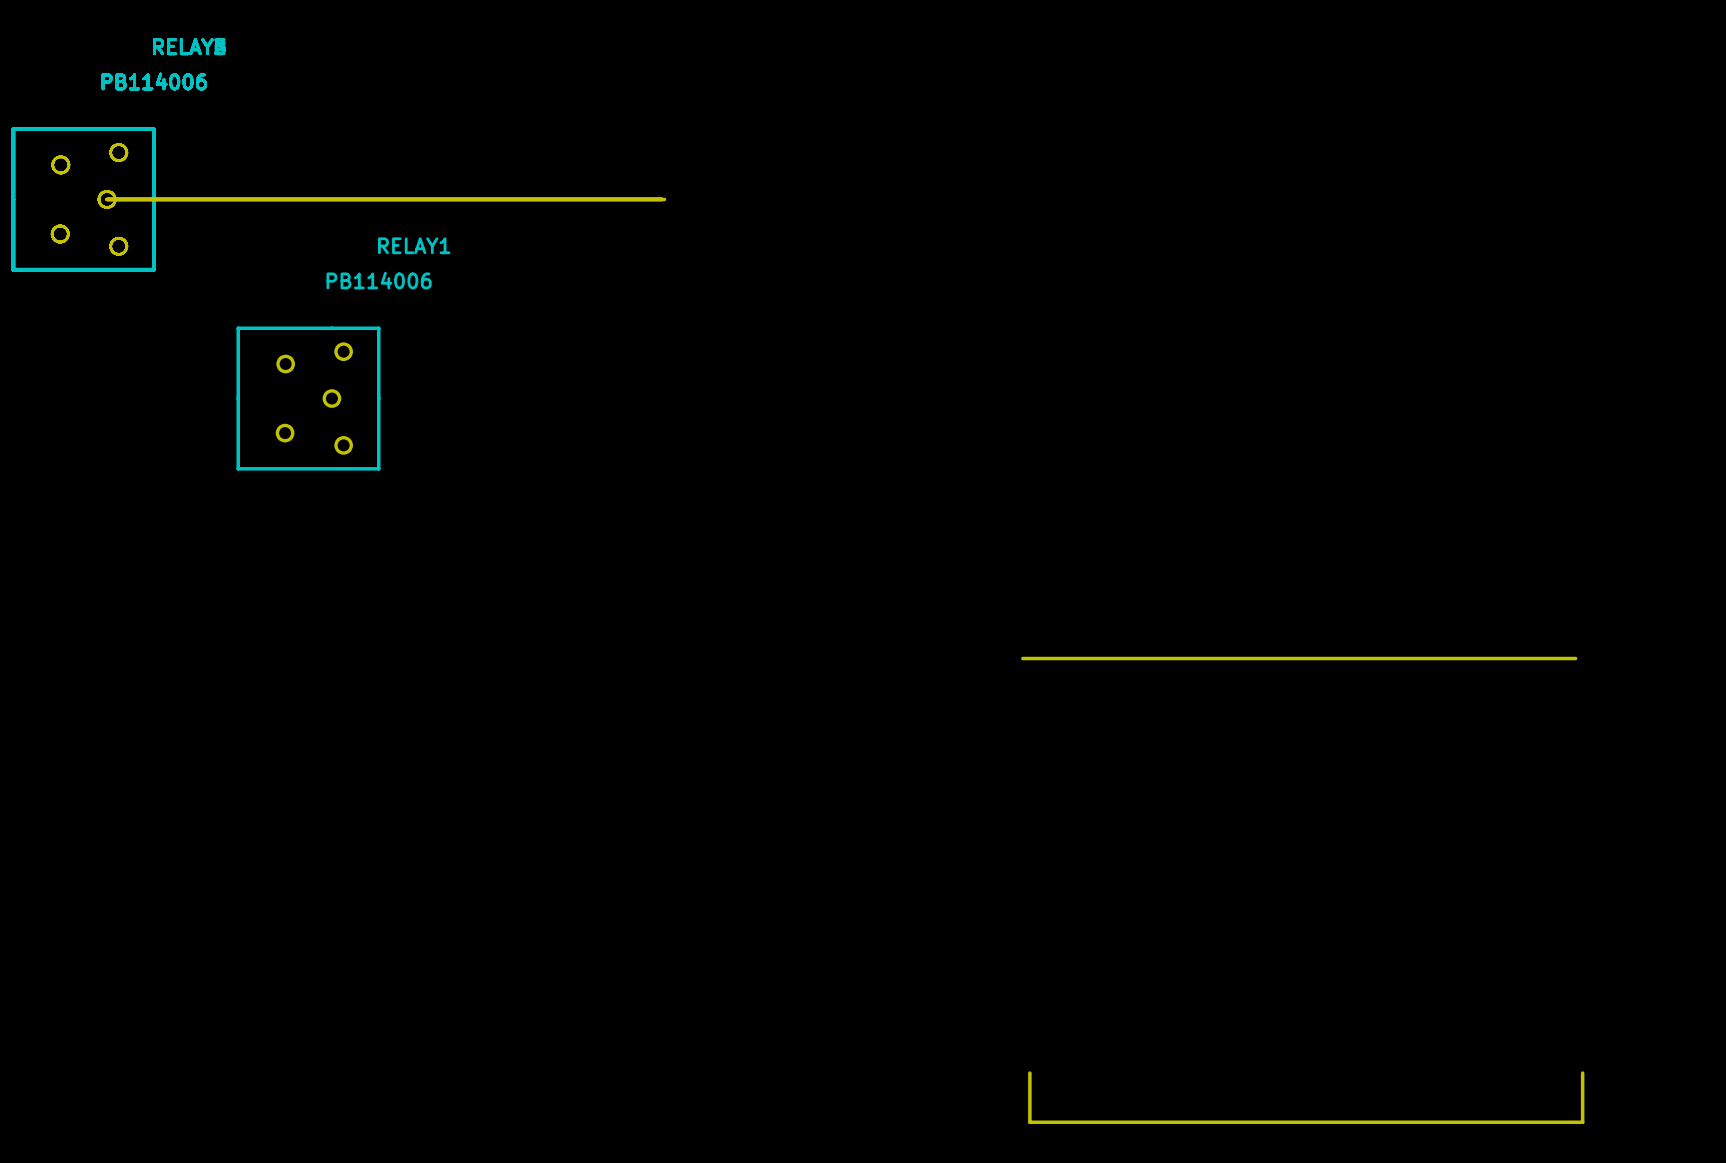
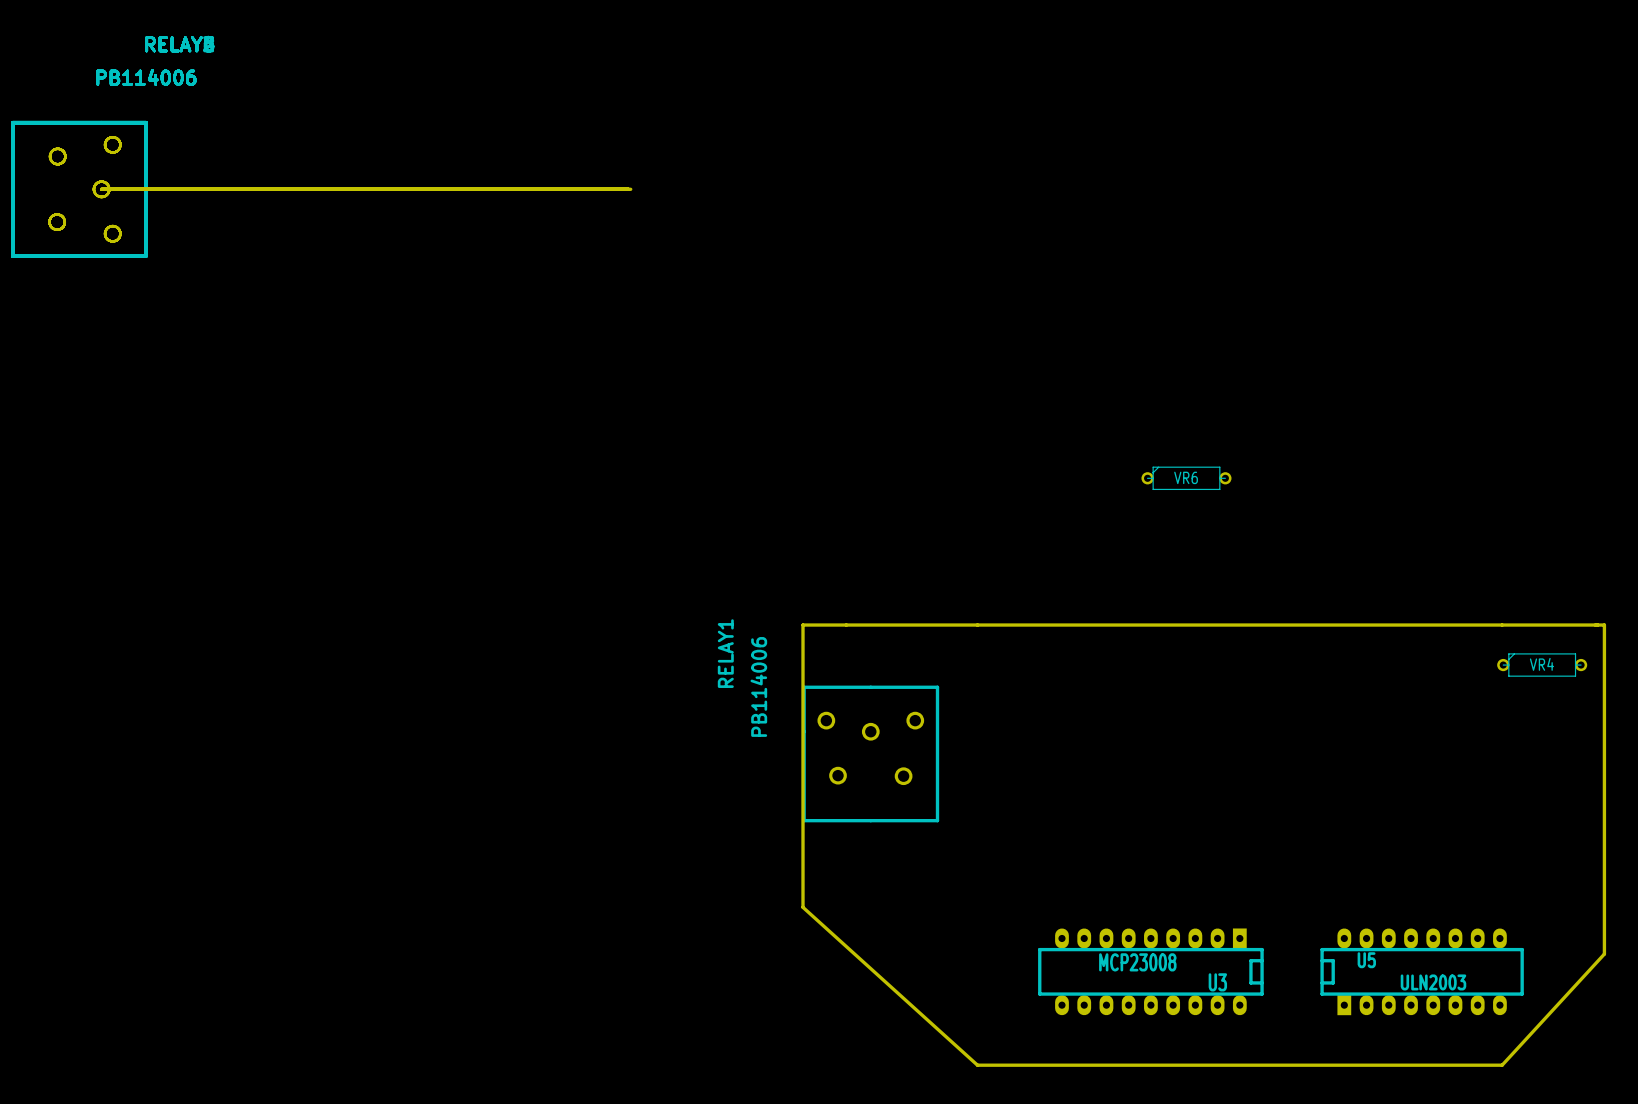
RELAY1 rotation: 0° (308, 398) -> 90° counterclockwise (870, 753)
RELAY1 position: (308, 398) -> (870, 753)
VR6: none -> (1186, 478)
VR4: none -> (1542, 665)
U3: none -> MCP23008 (1150, 971)
U5: none -> ULN2003 (1422, 971)
board edge: (1029, 1073) (1029, 1122) -> (970, 625) (803, 625) (803, 907) (977, 1065)
board edge: (1582, 1073) (1582, 1122) -> (1495, 625) (1604, 625) (1604, 954) (1502, 1065)

